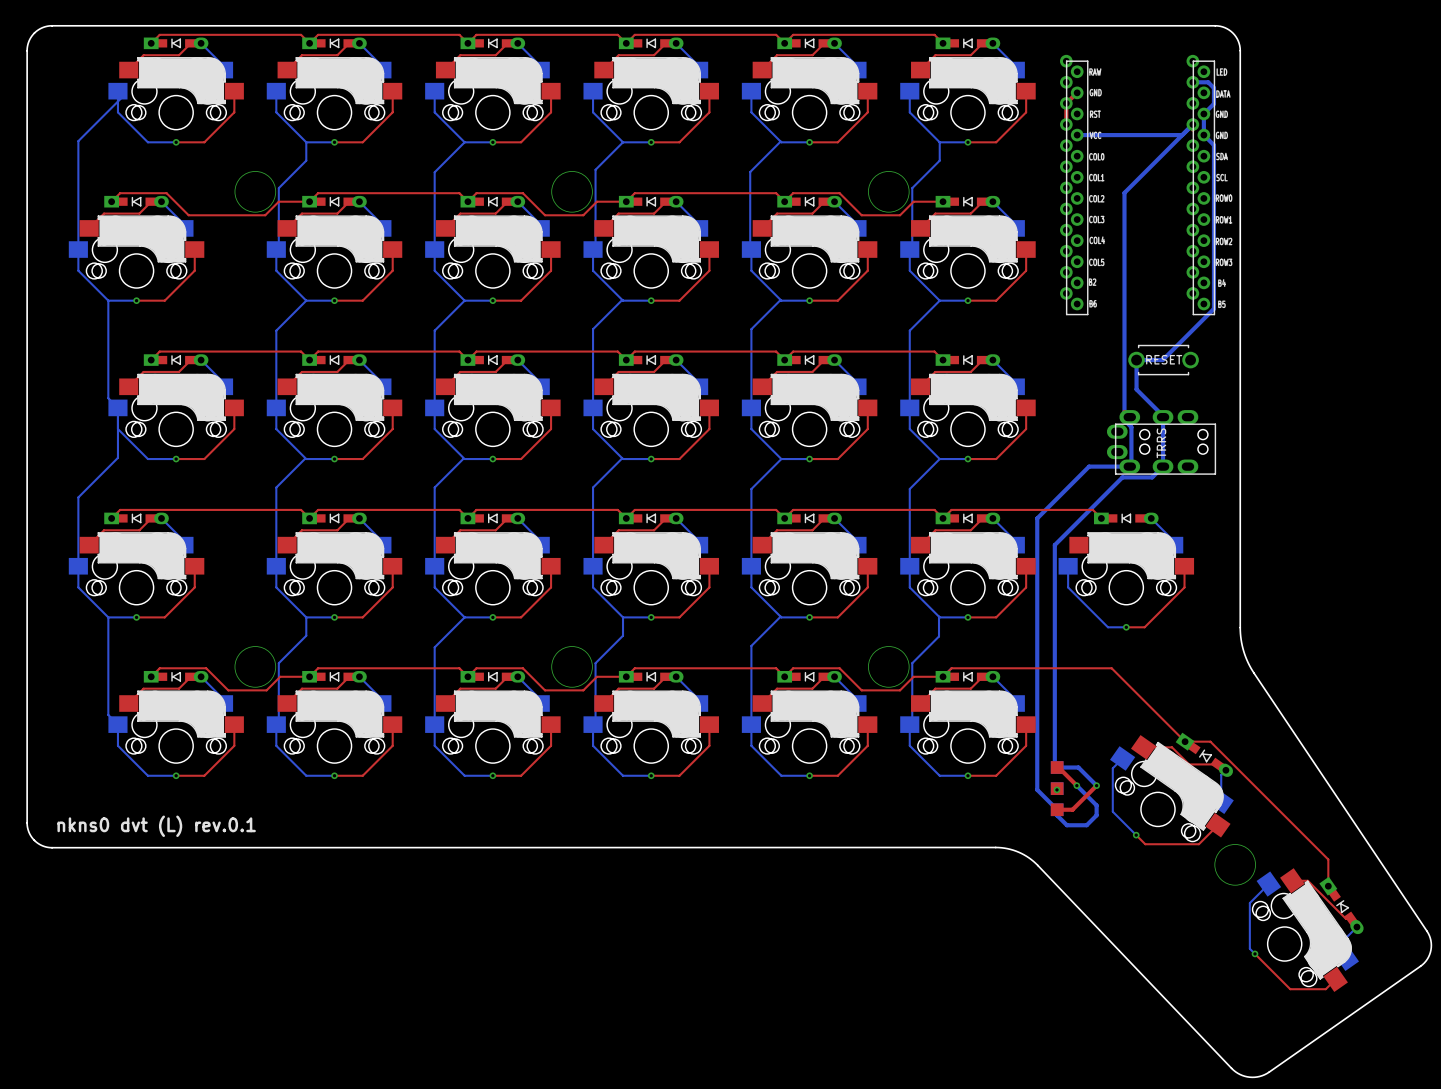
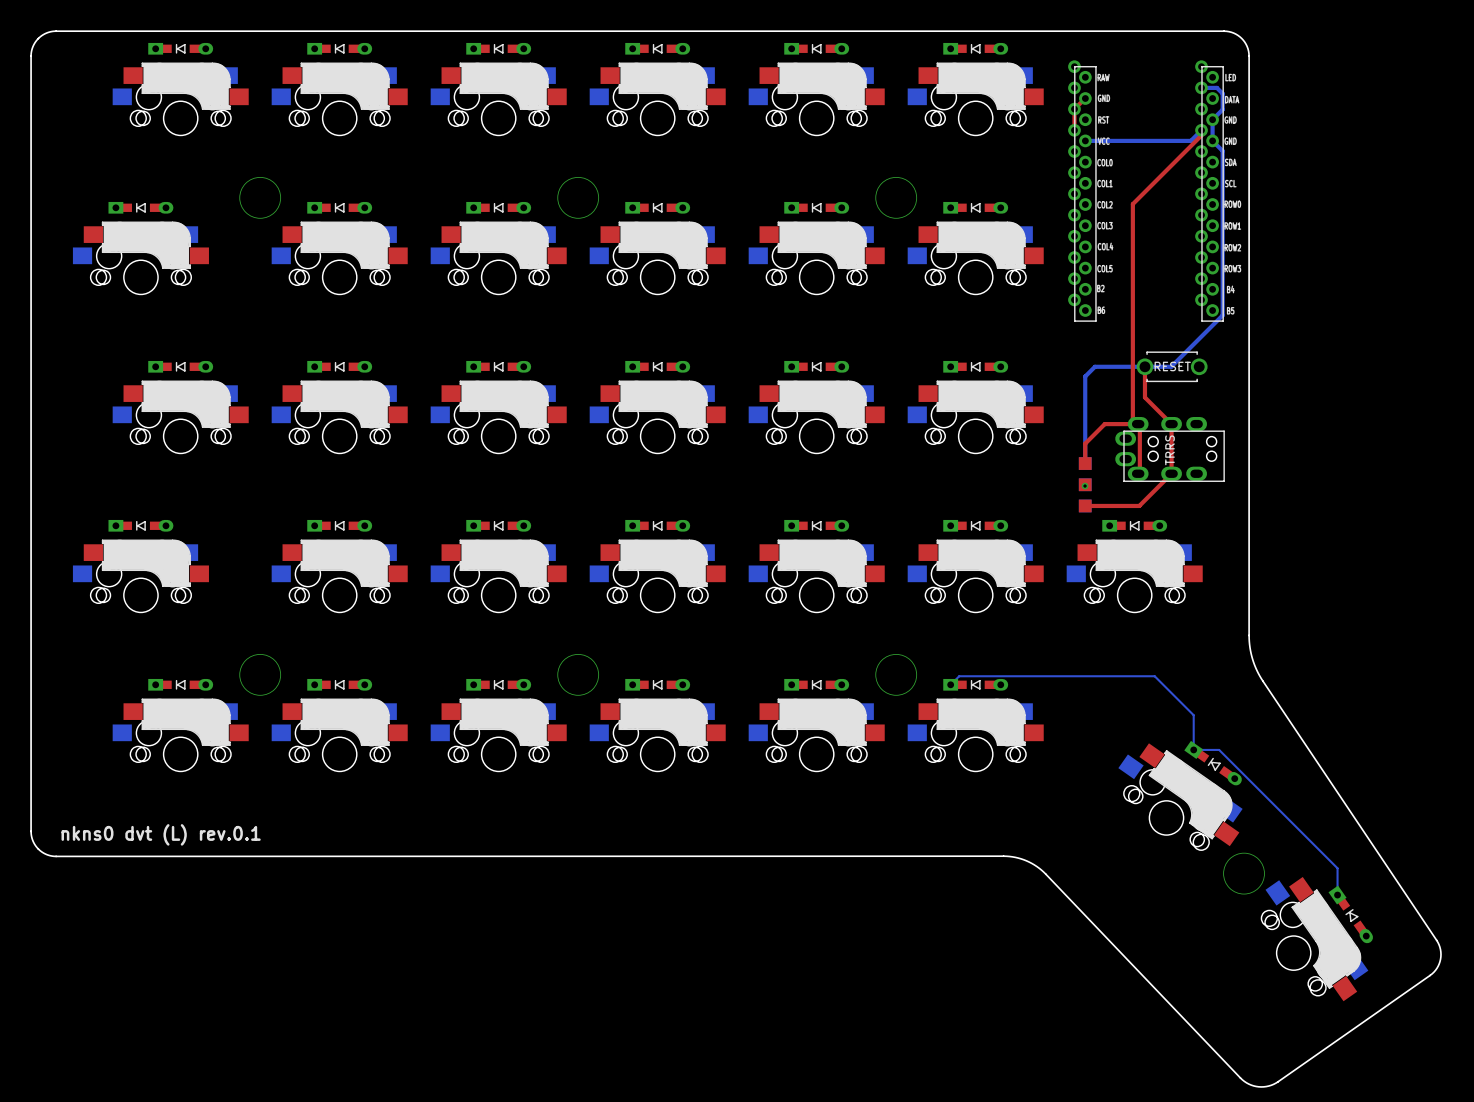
top track: (151, 43) (159, 34) (301, 34) (309, 43) (318, 34) (459, 34) (467, 43) (476, 34) (617, 34) (626, 43) (634, 34) (776, 34) (784, 43) (793, 34) (934, 34) (943, 43) -> none
top track: (190, 43) (179, 55) (143, 55) (128, 70) -> none
bottom track: (201, 43) (223, 65) (223, 70) -> none
top track: (349, 43) (337, 55) (301, 55) (287, 70) -> none
bottom track: (359, 43) (381, 65) (381, 70) -> none
top track: (507, 43) (495, 55) (460, 55) (445, 70) -> none
bottom track: (517, 43) (540, 65) (540, 70) -> none
top track: (665, 43) (654, 55) (618, 55) (603, 70) -> none
bottom track: (676, 43) (698, 65) (698, 70) -> none
top track: (824, 43) (812, 55) (777, 55) (762, 70) -> none
bottom track: (834, 43) (856, 65) (856, 70) -> none
top track: (982, 43) (970, 55) (935, 55) (920, 70) -> none
bottom track: (992, 43) (1015, 65) (1015, 70) -> none
top track: (234, 91) (234, 112) (204, 142) (176, 142) -> none
bottom track: (276, 91) (276, 112) (306, 142) -> none
top track: (392, 91) (392, 112) (362, 142) (334, 142) -> none
bottom track: (434, 91) (434, 112) (464, 142) -> none
top track: (551, 91) (551, 112) (521, 142) (492, 142) -> none
top track: (709, 91) (709, 112) (679, 142) (651, 142) -> none
bottom track: (751, 91) (751, 112) (781, 142) (809, 142) -> none
top track: (867, 91) (867, 112) (837, 142) (809, 142) -> none
bottom track: (909, 91) (909, 112) (939, 142) -> none
top track: (1026, 91) (1026, 112) (996, 142) (967, 142) -> none
bottom track: (595, 93) (593, 91) (593, 112) (623, 142) -> none
top track: none -> (1201, 135) (1132, 204) (1132, 418)
bottom track: (1182, 135) (1124, 192) (1124, 420) (1131, 427) (1131, 464) (1129, 466) (1089, 466) (1037, 518) (1037, 789) (1057, 809) (1057, 815) (1066, 825) (1086, 825) (1096, 815) (1096, 805) (1076, 785) -> none
bottom track: (780, 141) (750, 172) (751, 270) (781, 300) (809, 300) -> none
bottom track: (176, 142) (147, 142) (117, 112) (117, 91) (121, 97) (78, 141) (78, 270) (108, 300) -> none
via: (176, 142) -> none
bottom track: (306, 142) (334, 142) -> none
bottom track: (306, 142) (306, 160) (278, 188) (278, 247) (276, 249) (276, 270) (306, 300) -> none
via: (334, 142) -> none
bottom track: (464, 142) (492, 142) -> none
bottom track: (464, 142) (434, 172) (434, 270) (464, 300) -> none
via: (492, 142) -> none
bottom track: (623, 142) (651, 142) -> none
bottom track: (623, 142) (595, 169) (595, 247) (593, 249) (593, 270) (623, 300) (651, 300) -> none
via: (651, 142) -> none
via: (809, 142) -> none
bottom track: (939, 142) (967, 142) -> none
bottom track: (939, 142) (939, 160) (912, 188) (912, 247) (909, 249) (909, 270) (939, 300) -> none
via: (967, 142) -> none
top track: (111, 201) (120, 193) (166, 193) (188, 215) (265, 215) (278, 201) (309, 201) (318, 193) (459, 193) (467, 201) (476, 193) (522, 193) (545, 215) (583, 215) (596, 201) (626, 201) (634, 193) (776, 193) (784, 201) (793, 193) (839, 193) (861, 215) (900, 215) (913, 201) (943, 201) -> none
top track: (151, 201) (139, 213) (104, 213) (89, 228) -> none
bottom track: (161, 201) (183, 224) (183, 228) -> none
top track: (349, 201) (337, 213) (301, 213) (287, 228) -> none
bottom track: (359, 201) (381, 224) (381, 228) -> none
top track: (507, 201) (495, 213) (460, 213) (445, 228) -> none
bottom track: (517, 201) (540, 224) (540, 228) -> none
top track: (665, 201) (654, 213) (618, 213) (603, 228) -> none
bottom track: (676, 201) (698, 224) (698, 228) -> none
top track: (824, 201) (812, 213) (777, 213) (762, 228) -> none
bottom track: (834, 201) (856, 224) (856, 228) -> none
top track: (982, 201) (970, 213) (935, 213) (920, 228) -> none
bottom track: (992, 201) (1015, 224) (1015, 228) -> none
top track: (194, 249) (194, 270) (164, 300) (136, 300) -> none
top track: (392, 249) (392, 270) (362, 300) (334, 300) -> none
top track: (551, 249) (551, 270) (521, 300) (492, 300) -> none
top track: (709, 249) (709, 270) (679, 300) (651, 300) -> none
top track: (867, 249) (867, 270) (837, 300) (809, 300) -> none
top track: (1026, 249) (1026, 270) (996, 300) (967, 300) -> none
bottom track: (622, 299) (593, 329) (593, 429) (623, 459) (651, 459) -> none
bottom track: (780, 299) (751, 329) (751, 429) (781, 459) -> none
bottom track: (108, 300) (136, 300) -> none
bottom track: (108, 300) (108, 398) (117, 407) -> none
via: (136, 300) -> none
bottom track: (306, 300) (334, 300) -> none
bottom track: (306, 300) (276, 330) (276, 429) (306, 459) (334, 459) -> none
via: (334, 300) -> none
bottom track: (464, 300) (492, 300) -> none
bottom track: (464, 300) (434, 330) (434, 429) (464, 459) (492, 459) -> none
via: (492, 300) -> none
via: (651, 300) -> none
via: (809, 300) -> none
bottom track: (939, 300) (967, 300) -> none
bottom track: (939, 300) (909, 330) (909, 429) (939, 459) -> none
via: (967, 300) -> none
top track: (151, 360) (159, 351) (301, 351) (309, 360) (318, 351) (459, 351) (467, 360) (476, 351) (617, 351) (626, 360) (634, 351) (776, 351) (784, 360) (793, 351) (934, 351) (943, 360) -> none
top track: (190, 360) (179, 371) (143, 371) (128, 386) -> none
bottom track: (201, 360) (223, 382) (223, 386) -> none
top track: (349, 360) (337, 371) (301, 371) (287, 386) -> none
bottom track: (359, 360) (381, 382) (381, 386) -> none
top track: (507, 360) (495, 371) (460, 371) (445, 386) -> none
bottom track: (517, 360) (540, 382) (540, 386) -> none
top track: (665, 360) (654, 371) (618, 371) (603, 386) -> none
bottom track: (676, 360) (698, 382) (698, 386) -> none
top track: (824, 360) (812, 371) (777, 371) (762, 386) -> none
bottom track: (834, 360) (856, 382) (856, 386) -> none
top track: (982, 360) (970, 371) (935, 371) (920, 386) -> none
bottom track: (992, 360) (1015, 382) (1015, 386) -> none
top track: none -> (1144, 366) (1144, 397) (1171, 424) (1171, 473) (1139, 505) (1085, 505)
bottom track: (1136, 360) (1136, 389) (1163, 415) (1163, 466) (1152, 477) (1122, 477) (1054, 545) (1054, 765) (1057, 767) (1078, 767) (1096, 785) -> (1144, 366) (1094, 366) (1085, 376) (1085, 463)
bottom track: (117, 407) (117, 457) (78, 497) (78, 587) (108, 617) -> none
top track: (234, 407) (234, 429) (204, 459) (176, 459) -> none
top track: (392, 407) (392, 429) (362, 459) (334, 459) -> none
top track: (551, 407) (551, 429) (521, 459) (492, 459) -> none
top track: (709, 407) (709, 429) (679, 459) (651, 459) -> none
top track: (867, 407) (867, 429) (837, 459) (809, 459) -> none
top track: (1026, 407) (1026, 429) (996, 459) (967, 459) -> none
top track: none -> (1138, 424) (1104, 424) (1085, 443) (1085, 466)
top track: none -> (1139, 425) (1139, 472)
bottom track: (117, 429) (147, 459) (176, 459) -> none
bottom track: (622, 458) (593, 487) (593, 587) (623, 617) -> none
via: (176, 459) -> none
bottom track: (304, 459) (276, 487) (276, 587) (306, 617) -> none
via: (334, 459) -> none
bottom track: (463, 459) (434, 487) (434, 587) (464, 617) -> none
via: (492, 459) -> none
via: (651, 459) -> none
bottom track: (781, 459) (809, 459) -> none
bottom track: (781, 459) (751, 489) (751, 587) (781, 617) (809, 617) -> none
via: (809, 459) -> none
bottom track: (939, 459) (967, 459) -> none
bottom track: (939, 459) (909, 489) (909, 587) (939, 617) (967, 617) -> none
via: (967, 459) -> none
part: none -> (1085, 484)
via: none -> (1085, 486)
top track: (111, 518) (120, 509) (301, 509) (309, 518) (318, 509) (459, 509) (467, 518) (476, 509) (617, 509) (626, 518) (634, 509) (776, 509) (784, 518) (793, 509) (934, 509) (943, 518) (951, 509) (1092, 509) (1101, 518) -> none
top track: (151, 518) (139, 530) (104, 530) (89, 545) -> none
bottom track: (161, 518) (183, 540) (183, 545) -> none
top track: (349, 518) (337, 530) (301, 530) (287, 545) -> none
bottom track: (359, 518) (381, 540) (381, 545) -> none
top track: (507, 518) (495, 530) (460, 530) (445, 545) -> none
bottom track: (517, 518) (540, 540) (540, 545) -> none
top track: (665, 518) (654, 530) (618, 530) (603, 545) -> none
bottom track: (676, 518) (698, 540) (698, 545) -> none
top track: (824, 518) (812, 530) (777, 530) (762, 545) -> none
bottom track: (834, 518) (856, 540) (856, 545) -> none
top track: (982, 518) (970, 530) (935, 530) (920, 545) -> none
bottom track: (992, 518) (1015, 540) (1015, 545) -> none
bottom track: (1151, 518) (1173, 540) (1173, 545) -> none
top track: (194, 566) (194, 587) (164, 617) (136, 617) -> none
top track: (392, 566) (392, 587) (362, 617) (334, 617) -> none
top track: (551, 566) (551, 587) (521, 617) (492, 617) -> none
top track: (709, 566) (709, 587) (679, 617) (651, 617) -> none
top track: (867, 566) (867, 587) (837, 617) (809, 617) -> none
top track: (1026, 566) (1026, 587) (996, 617) (967, 617) -> none
bottom track: (1068, 566) (1068, 587) (1108, 627) (1126, 627) -> none
top track: (1184, 566) (1184, 587) (1144, 627) (1126, 627) -> none
bottom track: (780, 616) (751, 645) (751, 745) (781, 775) (809, 775) -> none
bottom track: (939, 616) (939, 636) (912, 663) (912, 722) (909, 724) (909, 745) (939, 775) (967, 775) -> none
bottom track: (108, 617) (136, 617) -> none
bottom track: (108, 617) (108, 715) (117, 724) -> none
via: (136, 617) -> none
bottom track: (306, 617) (334, 617) -> none
bottom track: (306, 617) (306, 635) (278, 663) (278, 722) (276, 724) (276, 745) (306, 775) (334, 775) -> none
via: (334, 617) -> none
bottom track: (464, 617) (492, 617) -> none
bottom track: (464, 617) (434, 647) (434, 745) (464, 775) (492, 775) -> none
via: (492, 617) -> none
bottom track: (623, 617) (651, 617) -> none
bottom track: (623, 617) (623, 635) (595, 663) (595, 722) (593, 724) (593, 745) (623, 775) (651, 775) -> none
via: (651, 617) -> none
via: (809, 617) -> none
via: (967, 617) -> none
via: (1126, 627) -> none
bottom track: none -> (959, 676) (1154, 676) (1193, 715) (1193, 749) (1219, 749) (1337, 868) (1337, 895)
top track: (151, 676) (159, 668) (206, 668) (228, 690) (266, 690) (280, 676) (309, 676) (318, 668) (459, 668) (467, 676) (476, 668) (522, 668) (545, 690) (583, 690) (596, 676) (626, 676) (634, 668) (776, 668) (784, 676) (793, 668) (839, 668) (861, 690) (900, 690) (913, 676) (953, 676) -> none
top track: (190, 676) (179, 688) (143, 688) (128, 703) -> none
bottom track: (201, 676) (223, 699) (223, 703) -> none
top track: (349, 676) (337, 688) (301, 688) (287, 703) -> none
bottom track: (359, 676) (381, 699) (381, 703) -> none
top track: (507, 676) (495, 688) (460, 688) (445, 703) -> none
bottom track: (517, 676) (540, 699) (540, 703) -> none
top track: (665, 676) (654, 688) (618, 688) (603, 703) -> none
bottom track: (676, 676) (698, 699) (698, 703) -> none
top track: (824, 676) (812, 688) (777, 688) (762, 703) -> none
bottom track: (834, 676) (856, 699) (856, 703) -> none
top track: (943, 676) (951, 668) (1111, 668) (1185, 741) (1210, 741) (1328, 859) (1328, 886) -> none
top track: (982, 676) (970, 688) (935, 688) (920, 703) -> none
bottom track: (992, 676) (1015, 699) (1015, 703) -> none
bottom track: (117, 724) (117, 745) (147, 775) (176, 775) -> none
top track: (234, 724) (234, 745) (204, 775) (176, 775) -> none
top track: (392, 724) (392, 745) (362, 775) (334, 775) -> none
top track: (551, 724) (551, 745) (521, 775) (492, 775) -> none
top track: (709, 724) (709, 745) (679, 775) (651, 775) -> none
top track: (867, 724) (867, 745) (837, 775) (809, 775) -> none
top track: (1026, 724) (1026, 745) (996, 775) (967, 775) -> none
top track: (1143, 747) (1172, 747) (1189, 764) (1217, 764) -> none
bottom track: (1122, 758) (1112, 768) (1112, 811) (1136, 835) -> none
top track: (1057, 770) (1058, 767) (1076, 785) -> none
bottom track: (1225, 770) (1221, 774) (1221, 801) -> none
via: (176, 775) -> none
via: (334, 775) -> none
via: (492, 775) -> none
via: (651, 775) -> none
via: (809, 775) -> none
via: (967, 775) -> none
via: (1076, 785) -> none
top track: (1096, 785) (1072, 809) (1057, 809) -> none
via: (1096, 785) -> none
part: (1057, 788) -> none
via: (1056, 789) -> none
top track: (1217, 825) (1198, 844) (1145, 844) (1136, 835) -> none
via: (1136, 835) -> none
top track: (1292, 880) (1307, 880) (1345, 918) (1351, 918) -> none
bottom track: (1268, 884) (1249, 903) (1249, 948) (1254, 953) -> none
bottom track: (1356, 927) (1346, 937) (1346, 958) -> none
top track: (1254, 953) (1290, 989) (1325, 989) (1335, 979) -> none
via: (1254, 953) -> none

